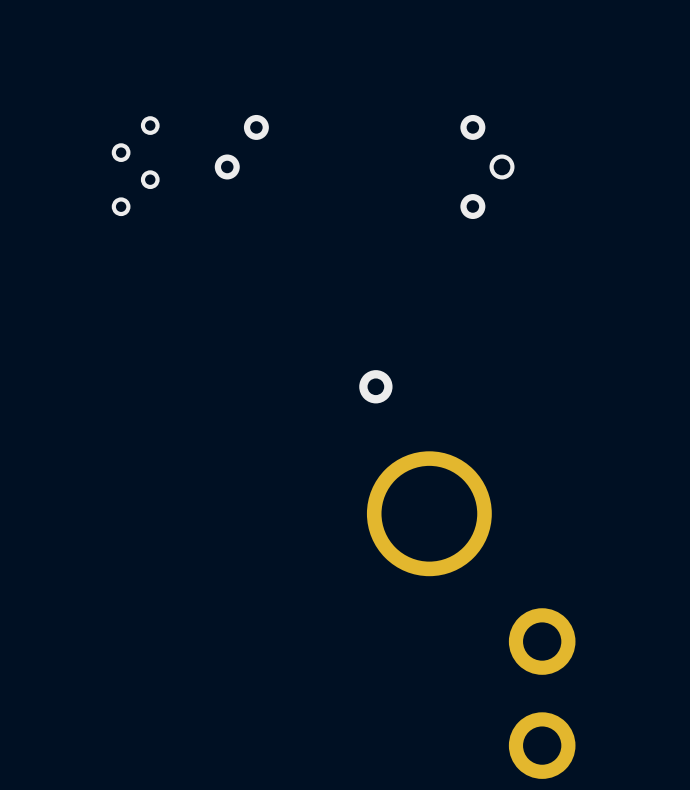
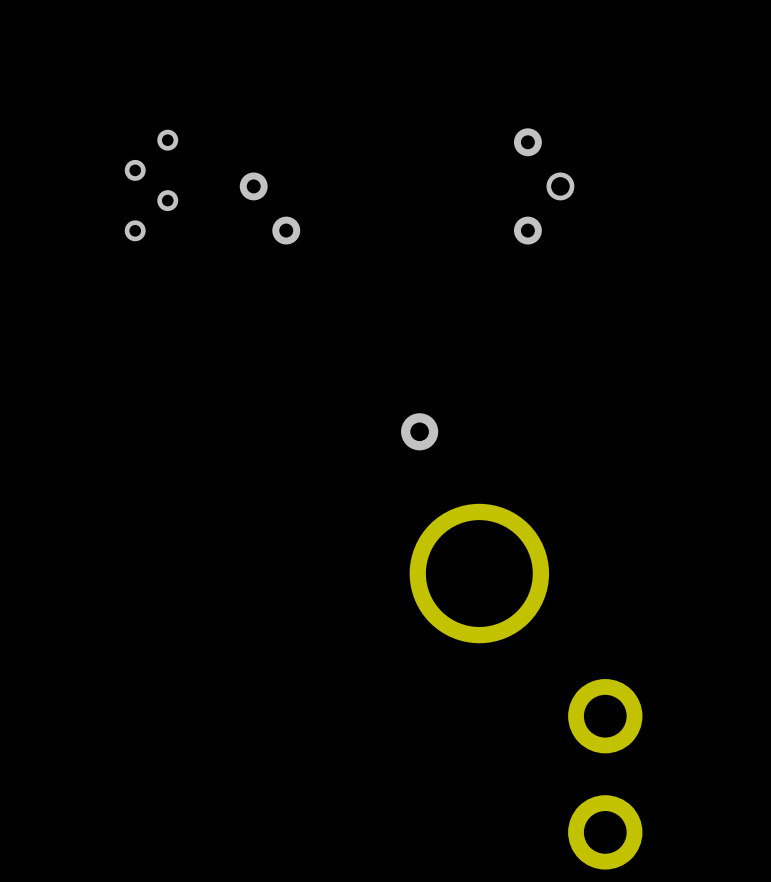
via position: (256, 127) -> (286, 230)

